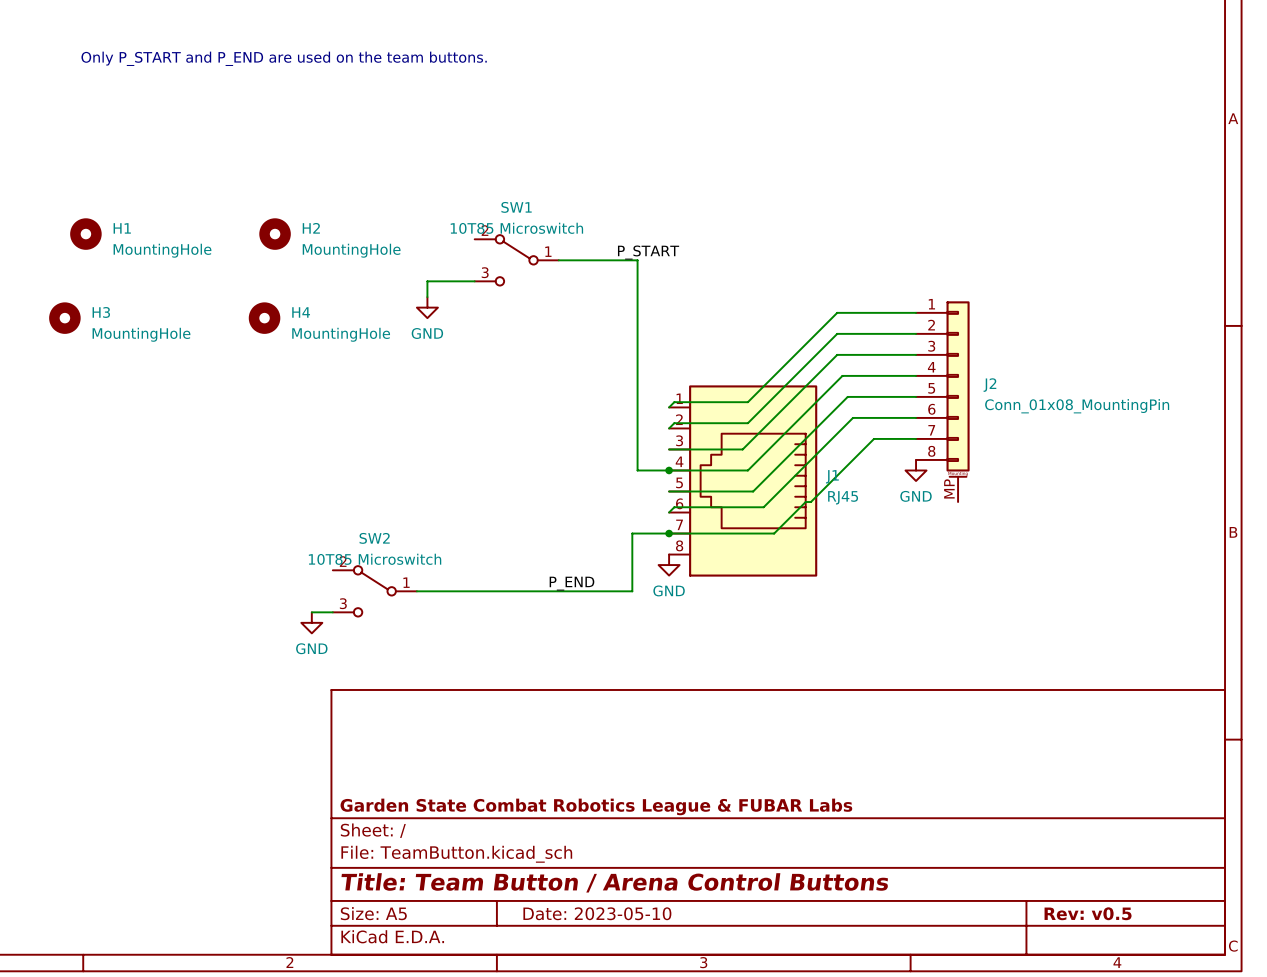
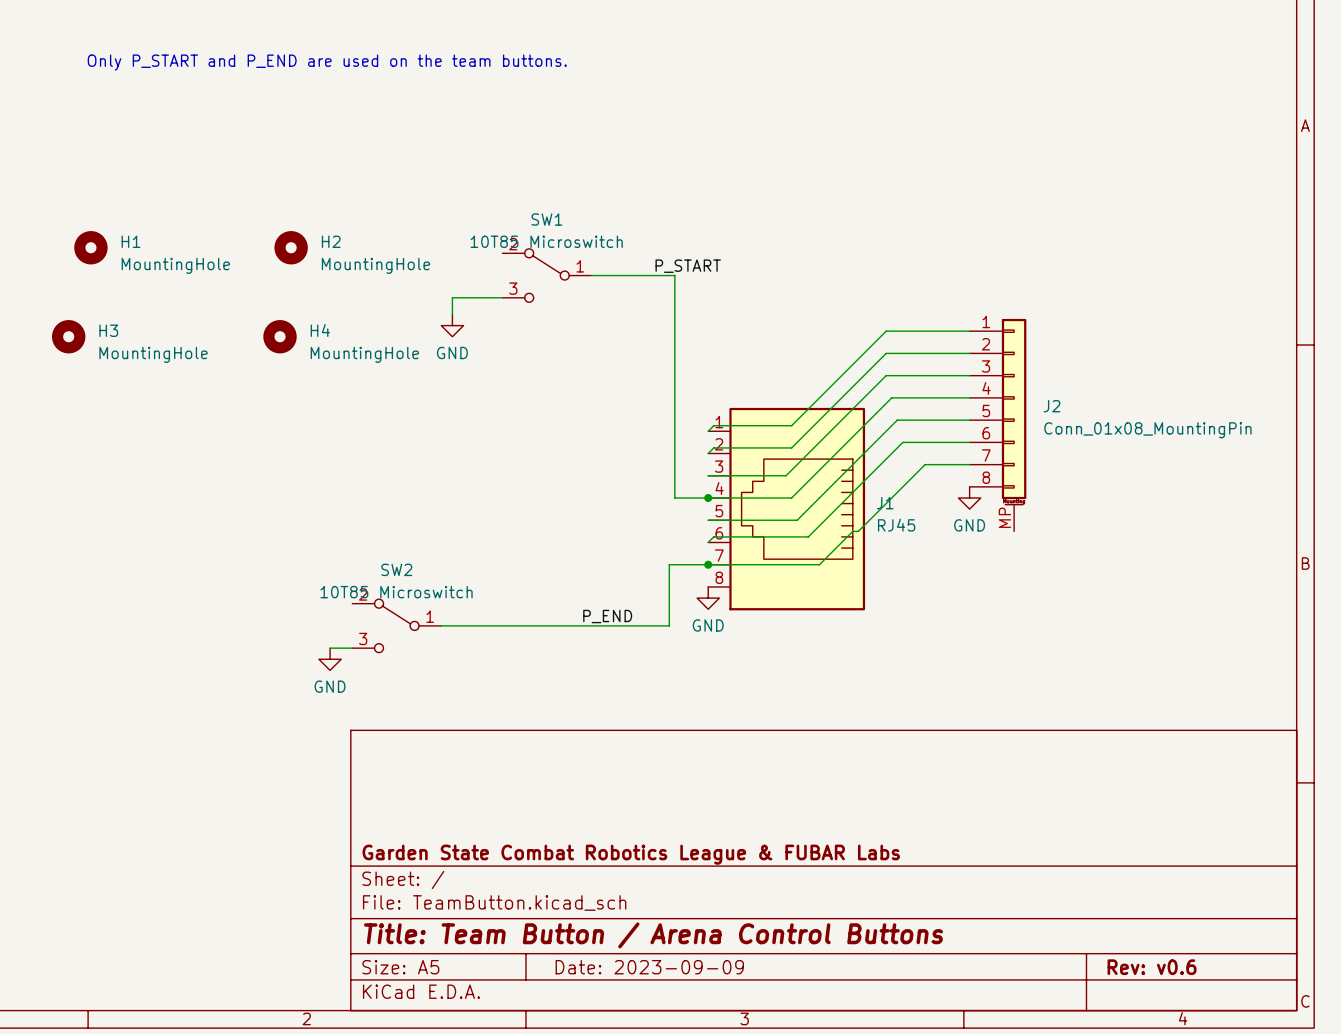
title block: Date: 2023-05-10 (597, 913) -> Date: 2023-09-09 (649, 967)
title block: Rev: v0.5 (1088, 913) -> Rev: v0.6 (1152, 967)

